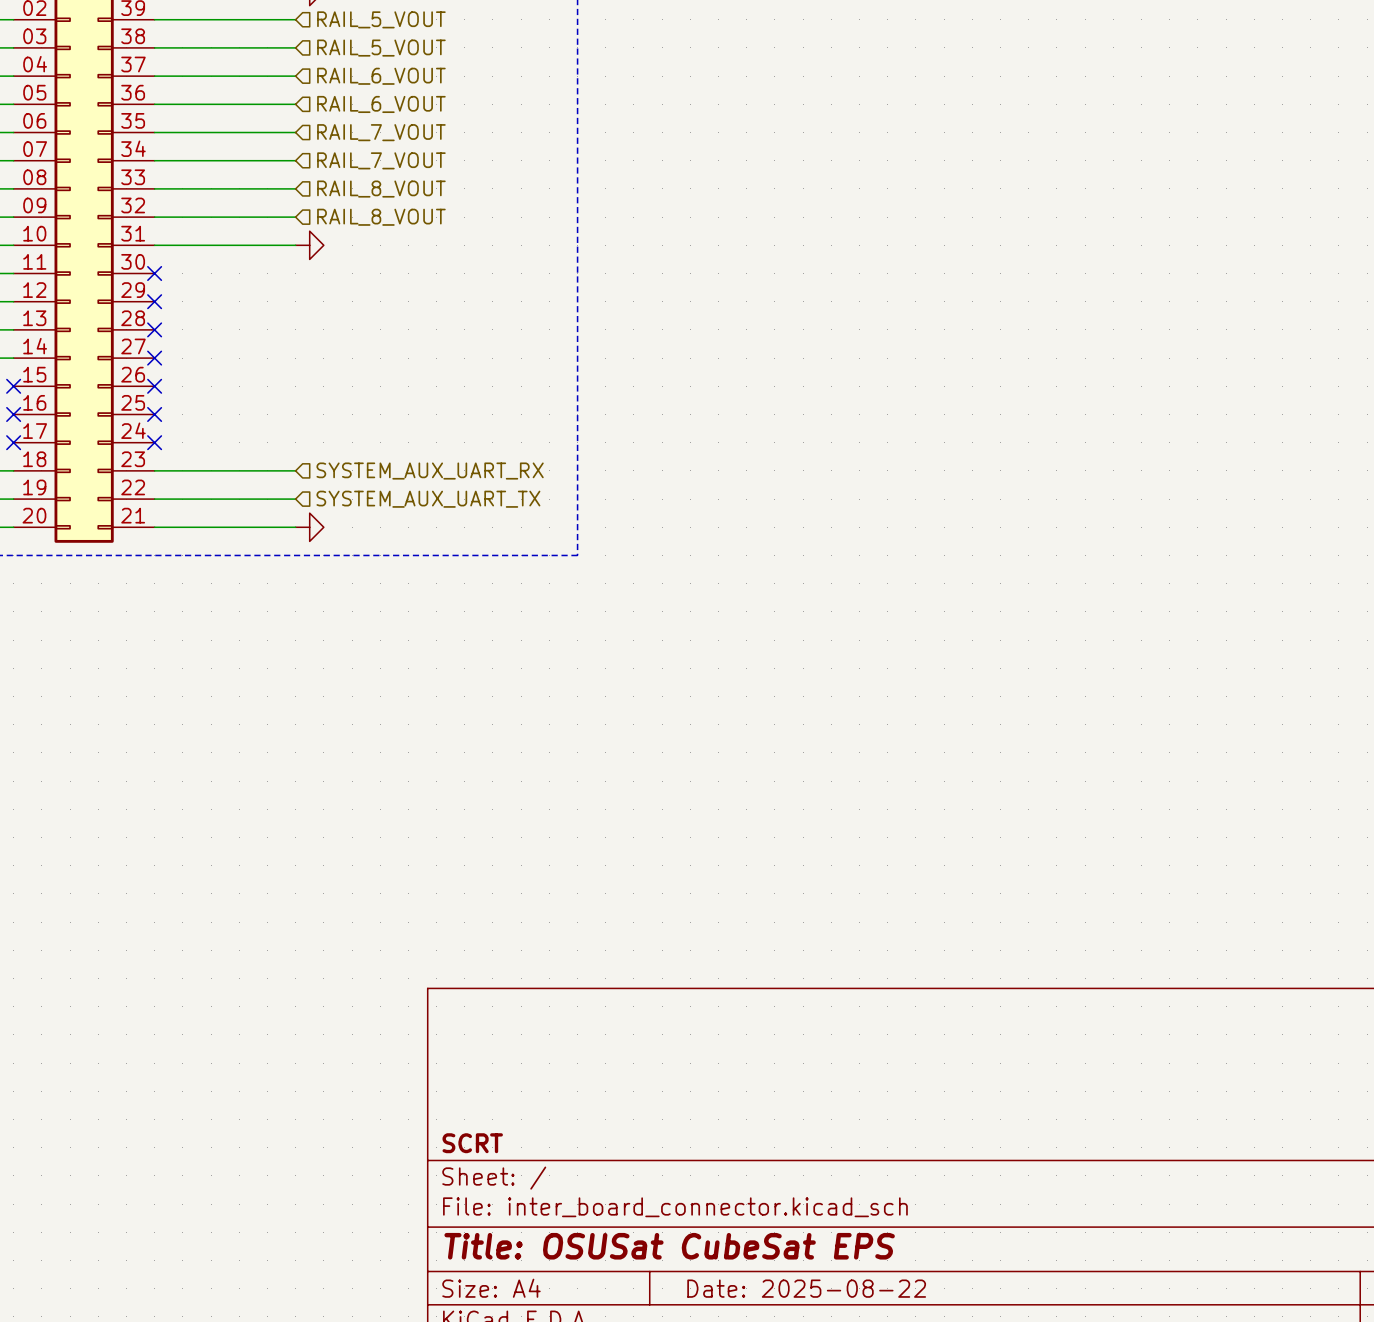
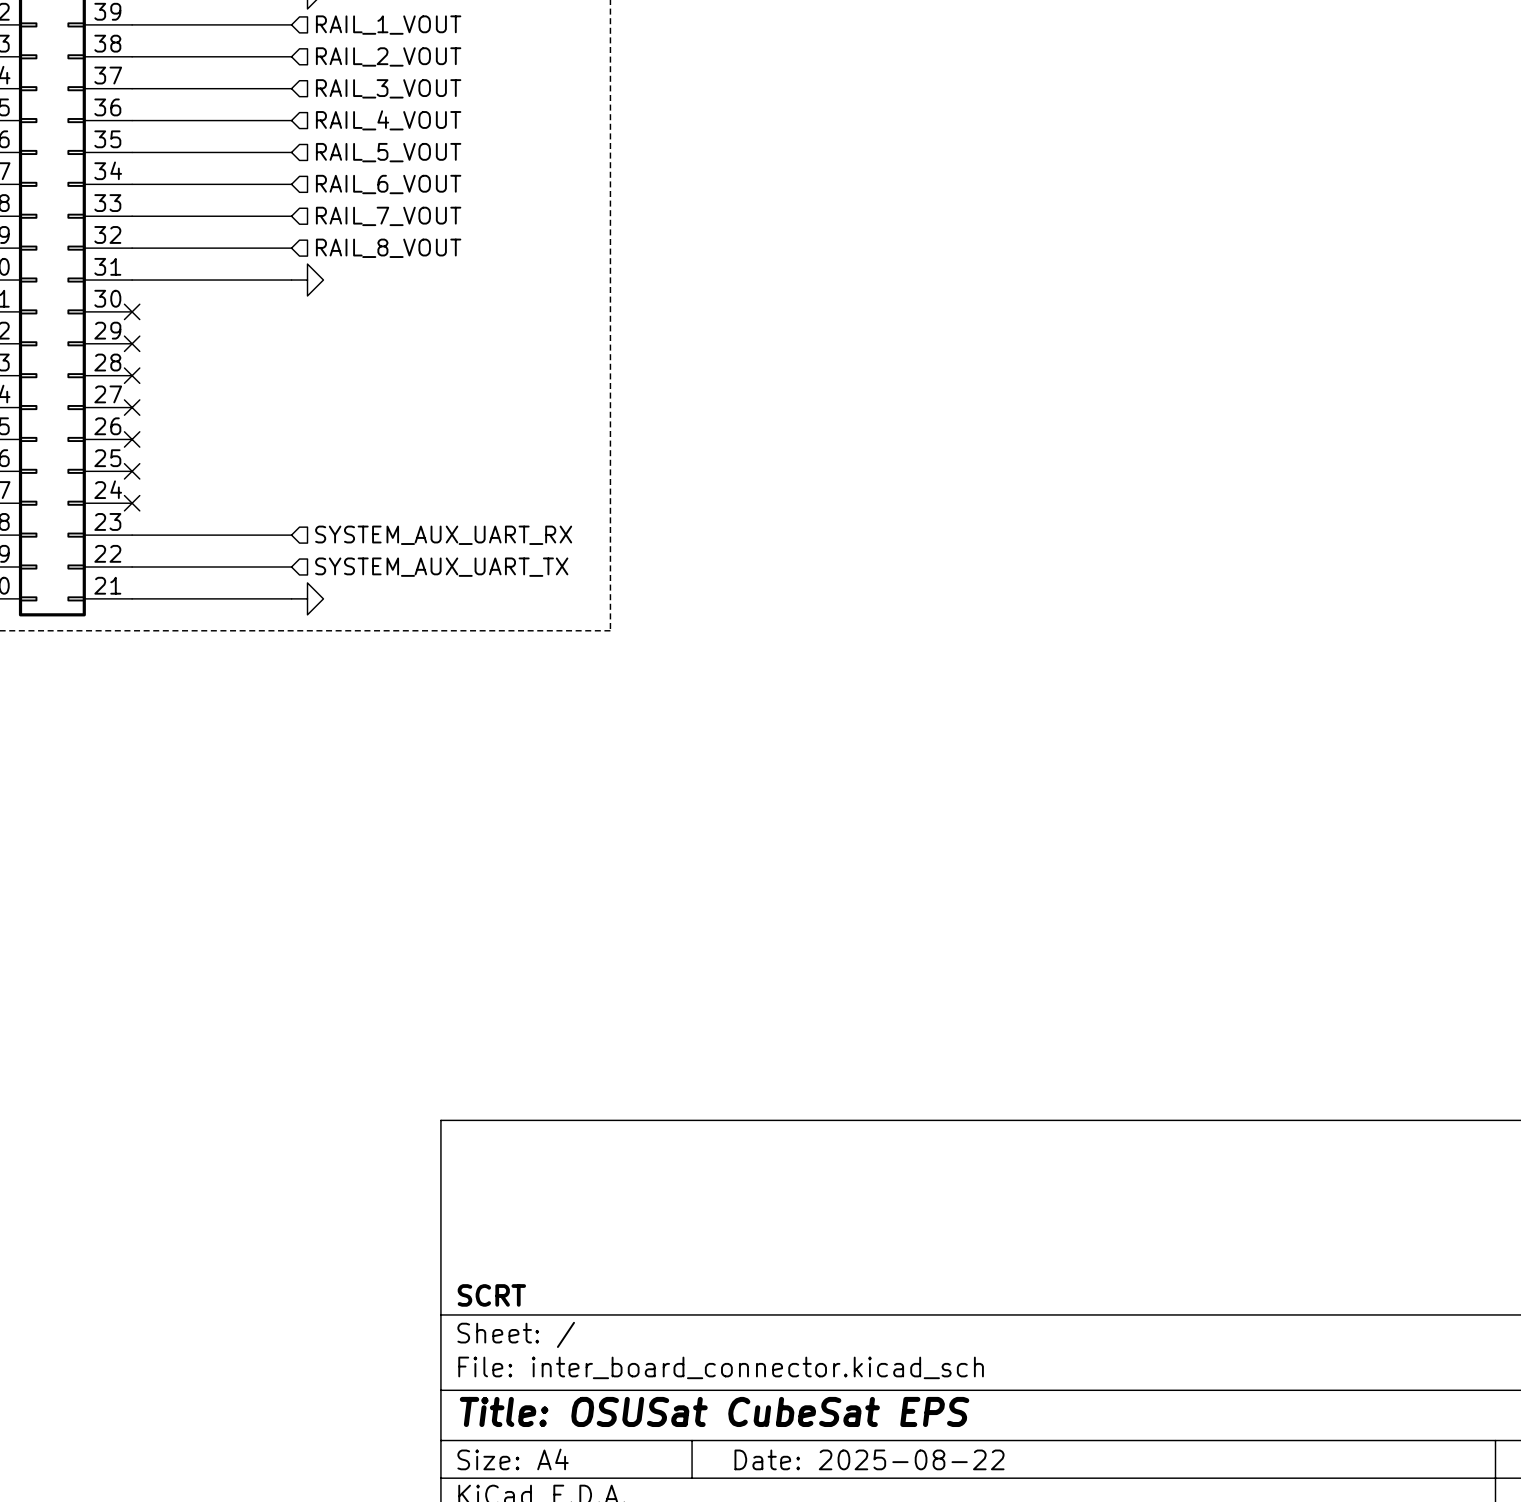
hierarchical label: RAIL_5_VOUT (381, 19) -> RAIL_1_VOUT (388, 25)
hierarchical label: RAIL_5_VOUT (381, 48) -> RAIL_2_VOUT (388, 56)
hierarchical label: RAIL_6_VOUT (381, 76) -> RAIL_3_VOUT (388, 88)
hierarchical label: RAIL_6_VOUT (381, 104) -> RAIL_4_VOUT (388, 120)
hierarchical label: RAIL_7_VOUT (381, 132) -> RAIL_5_VOUT (388, 152)
hierarchical label: RAIL_7_VOUT (381, 160) -> RAIL_6_VOUT (388, 184)
hierarchical label: RAIL_8_VOUT (381, 189) -> RAIL_7_VOUT (388, 216)

